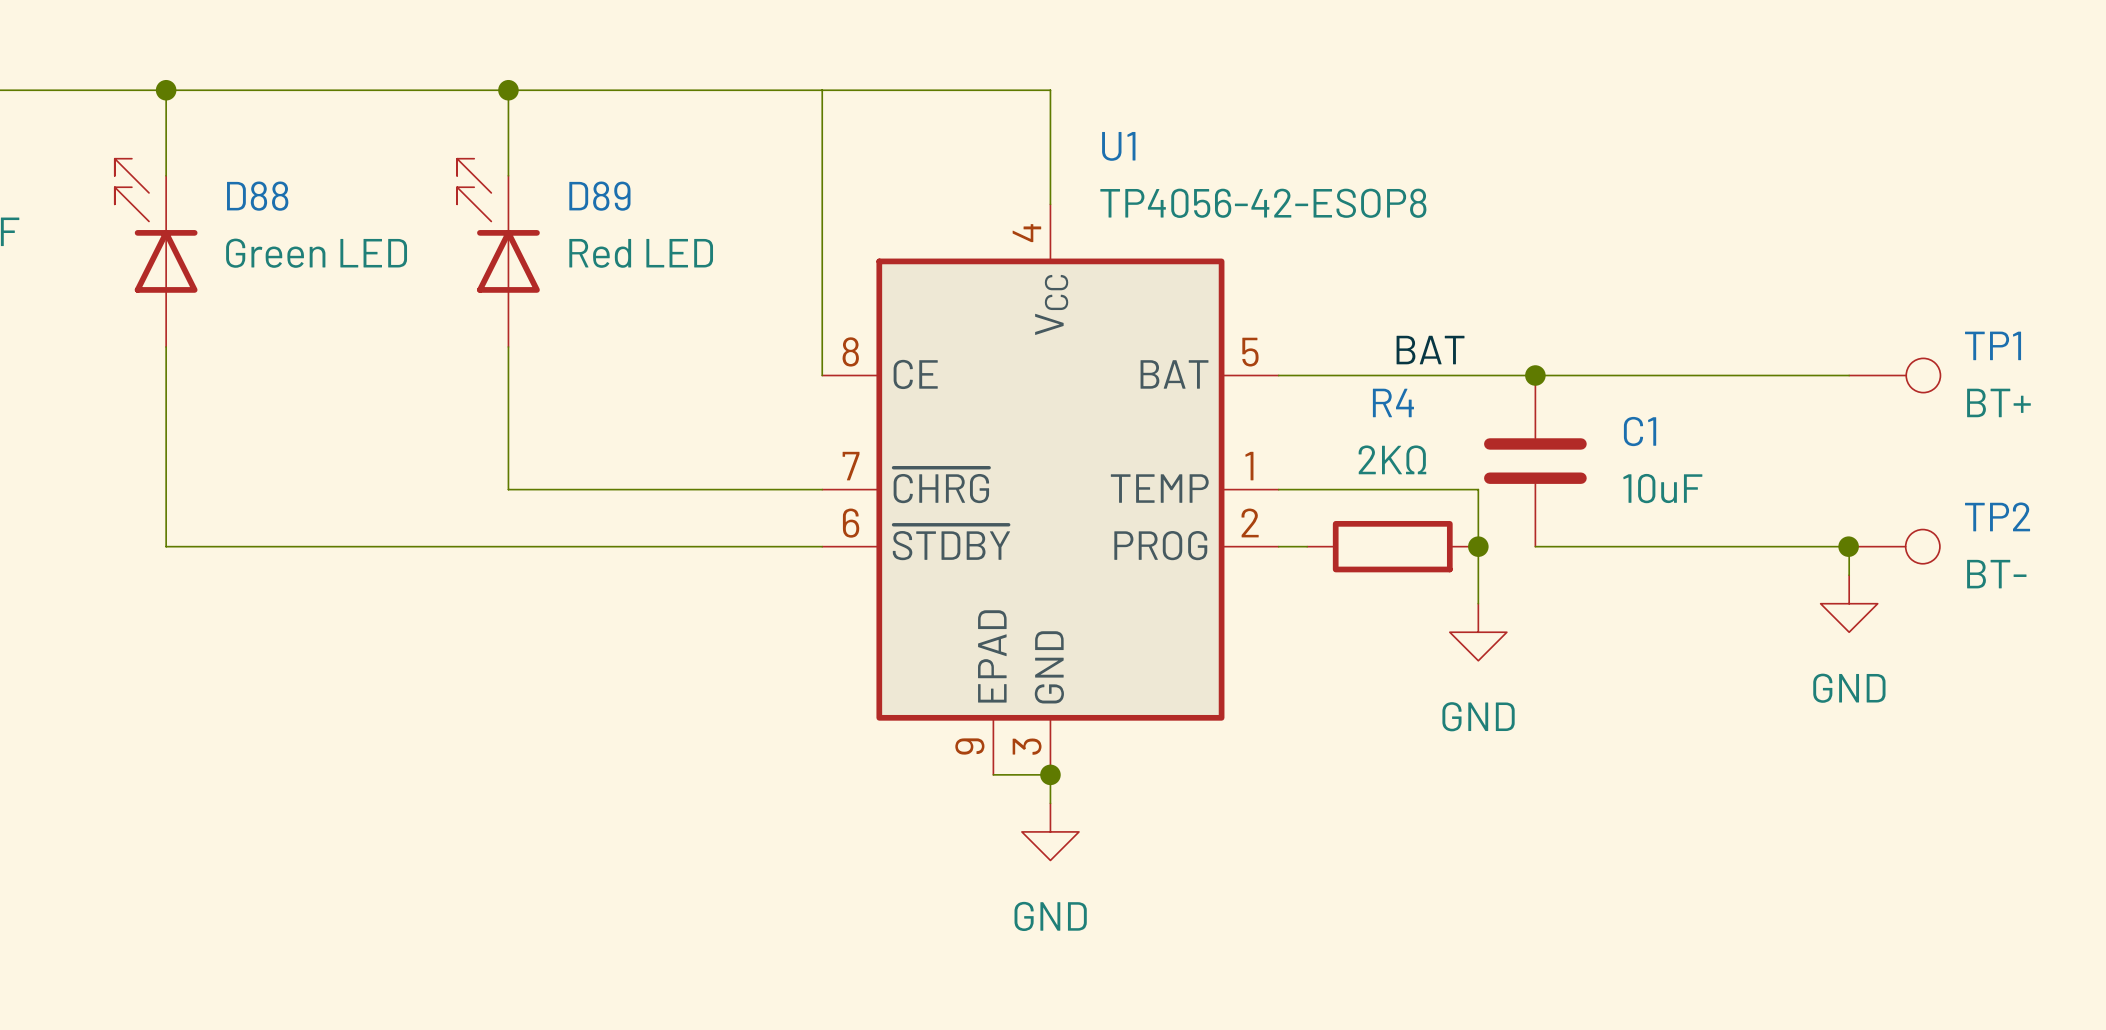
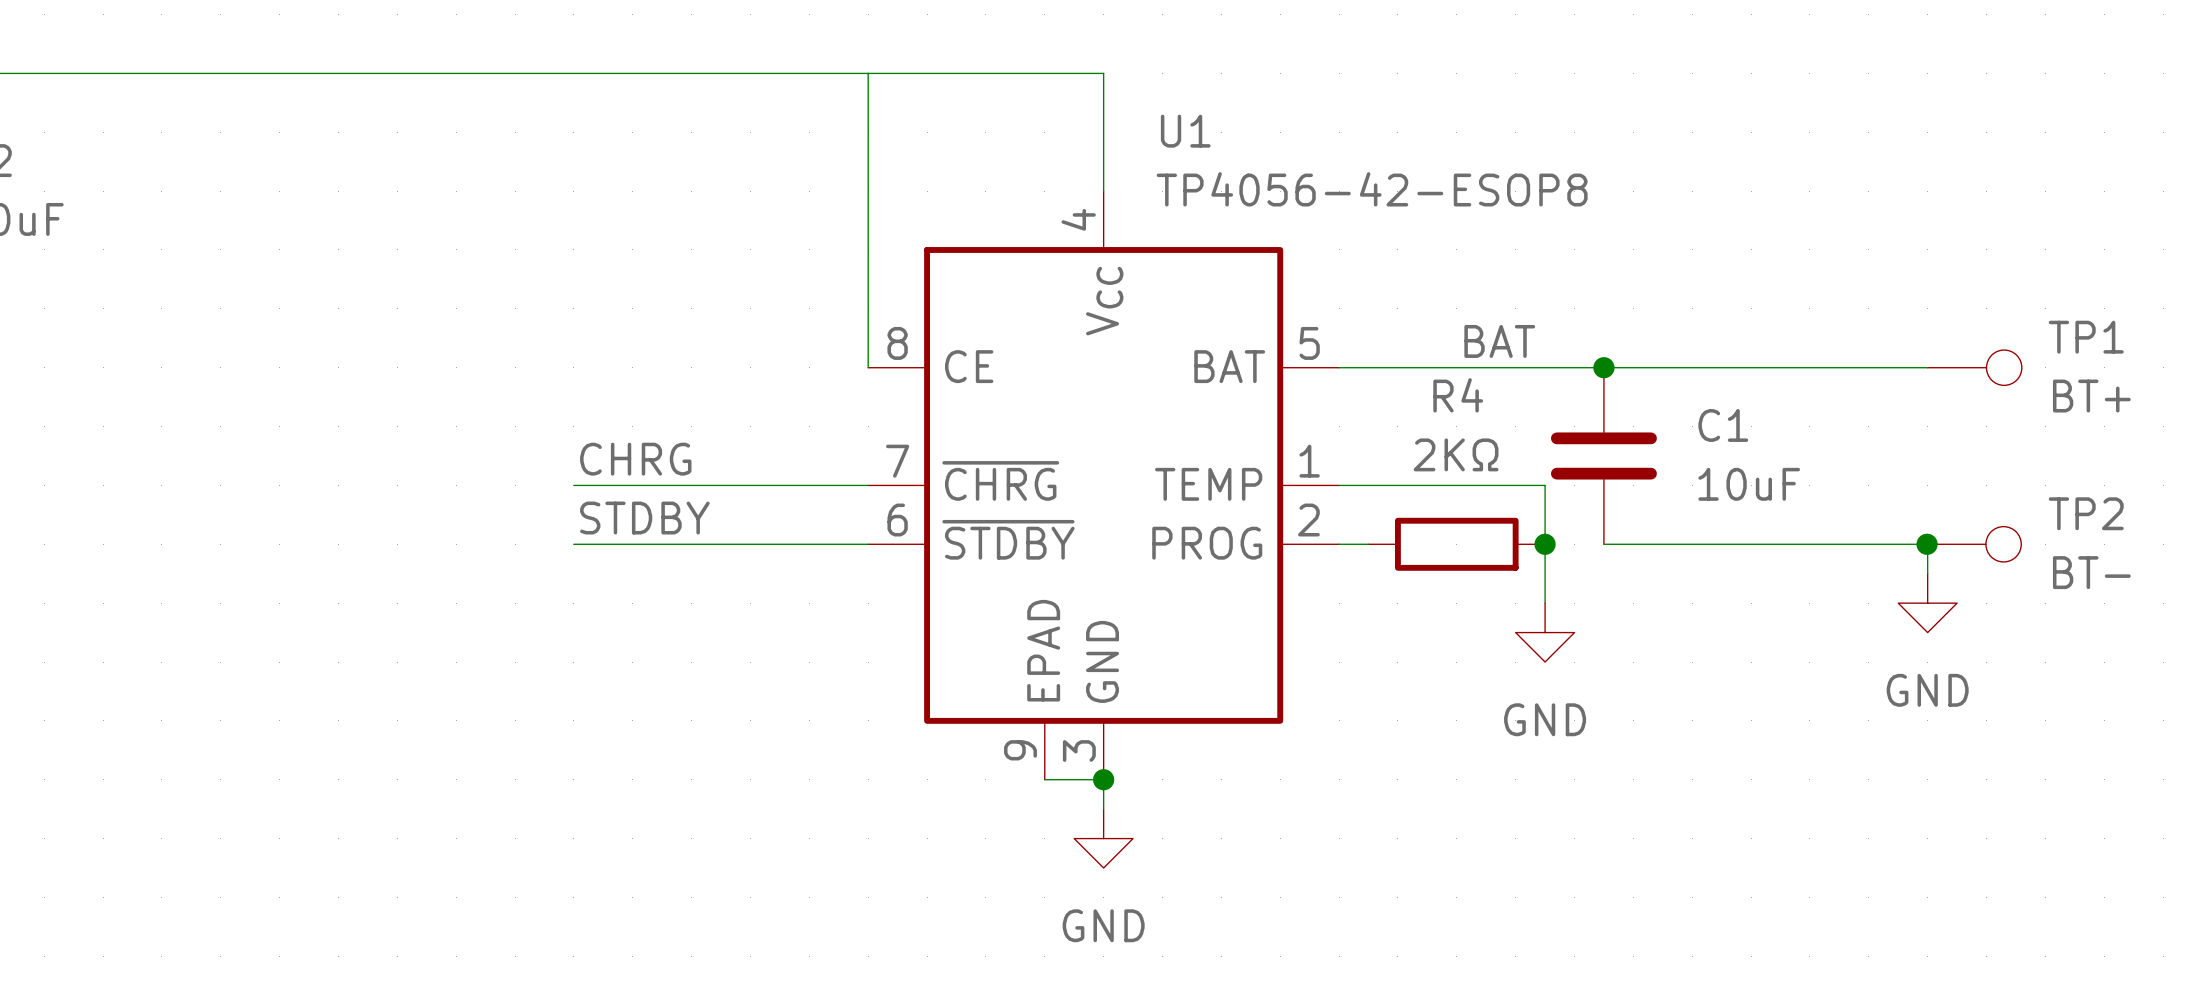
wire: (166, 90) (166, 175) -> none
junction: (166, 90) -> none
wire: (508, 90) (508, 175) -> none
junction: (508, 90) -> none
D88: Green LED (156, 252) -> none
D89: Red LED (498, 252) -> none
wire: (166, 346) (166, 546) (536, 546) -> none
wire: (508, 346) (508, 489) (536, 489) -> none
label: none -> CHRG (635, 459)
label: none -> STDBY (644, 518)

